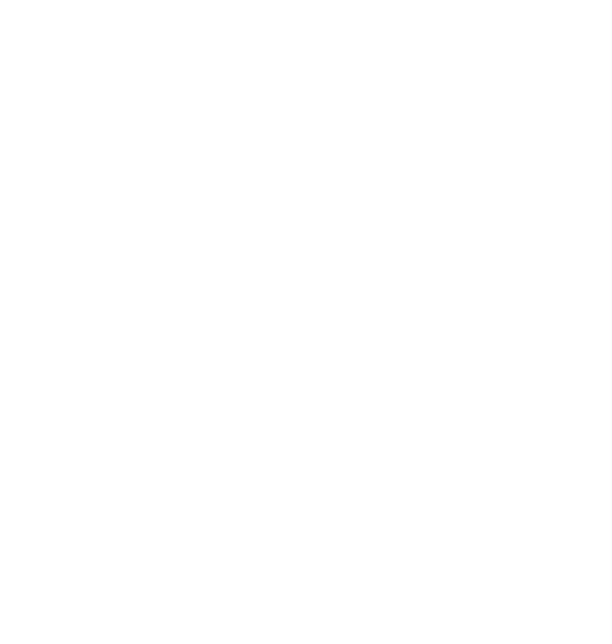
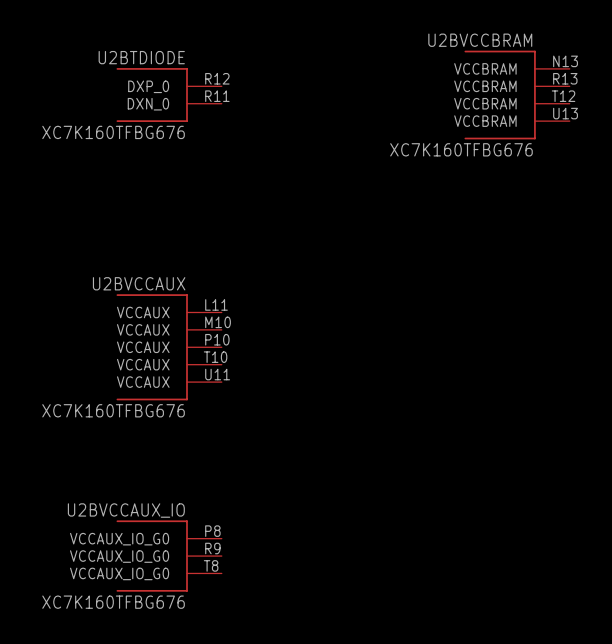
U2BTDIODE: none -> XC7K160TFBG676 (169, 95)
U2BVCCBRAM: none -> XC7K160TFBG676 (517, 95)
U2BVCCAUX: none -> XC7K160TFBG676 (169, 347)
U2BVCCAUX_IO: none -> XC7K160TFBG676 (169, 556)

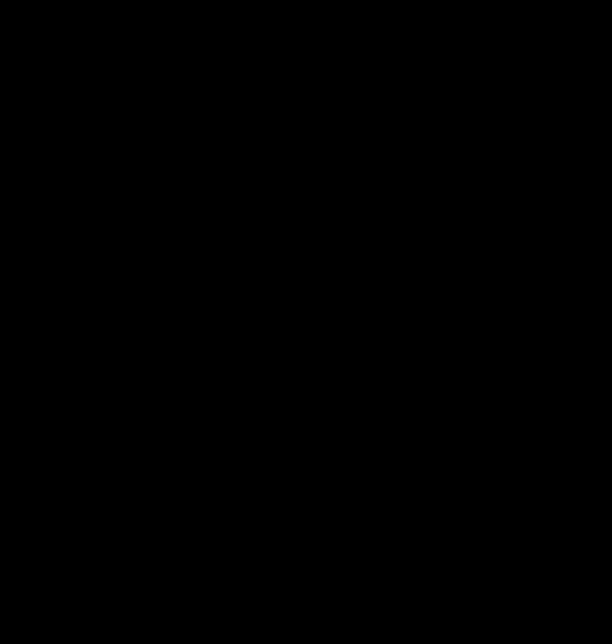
U2BTDIODE: XC7K160TFBG676 (169, 95) -> none
U2BVCCBRAM: XC7K160TFBG676 (517, 95) -> none
U2BVCCAUX: XC7K160TFBG676 (169, 347) -> none
U2BVCCAUX_IO: XC7K160TFBG676 (169, 556) -> none

